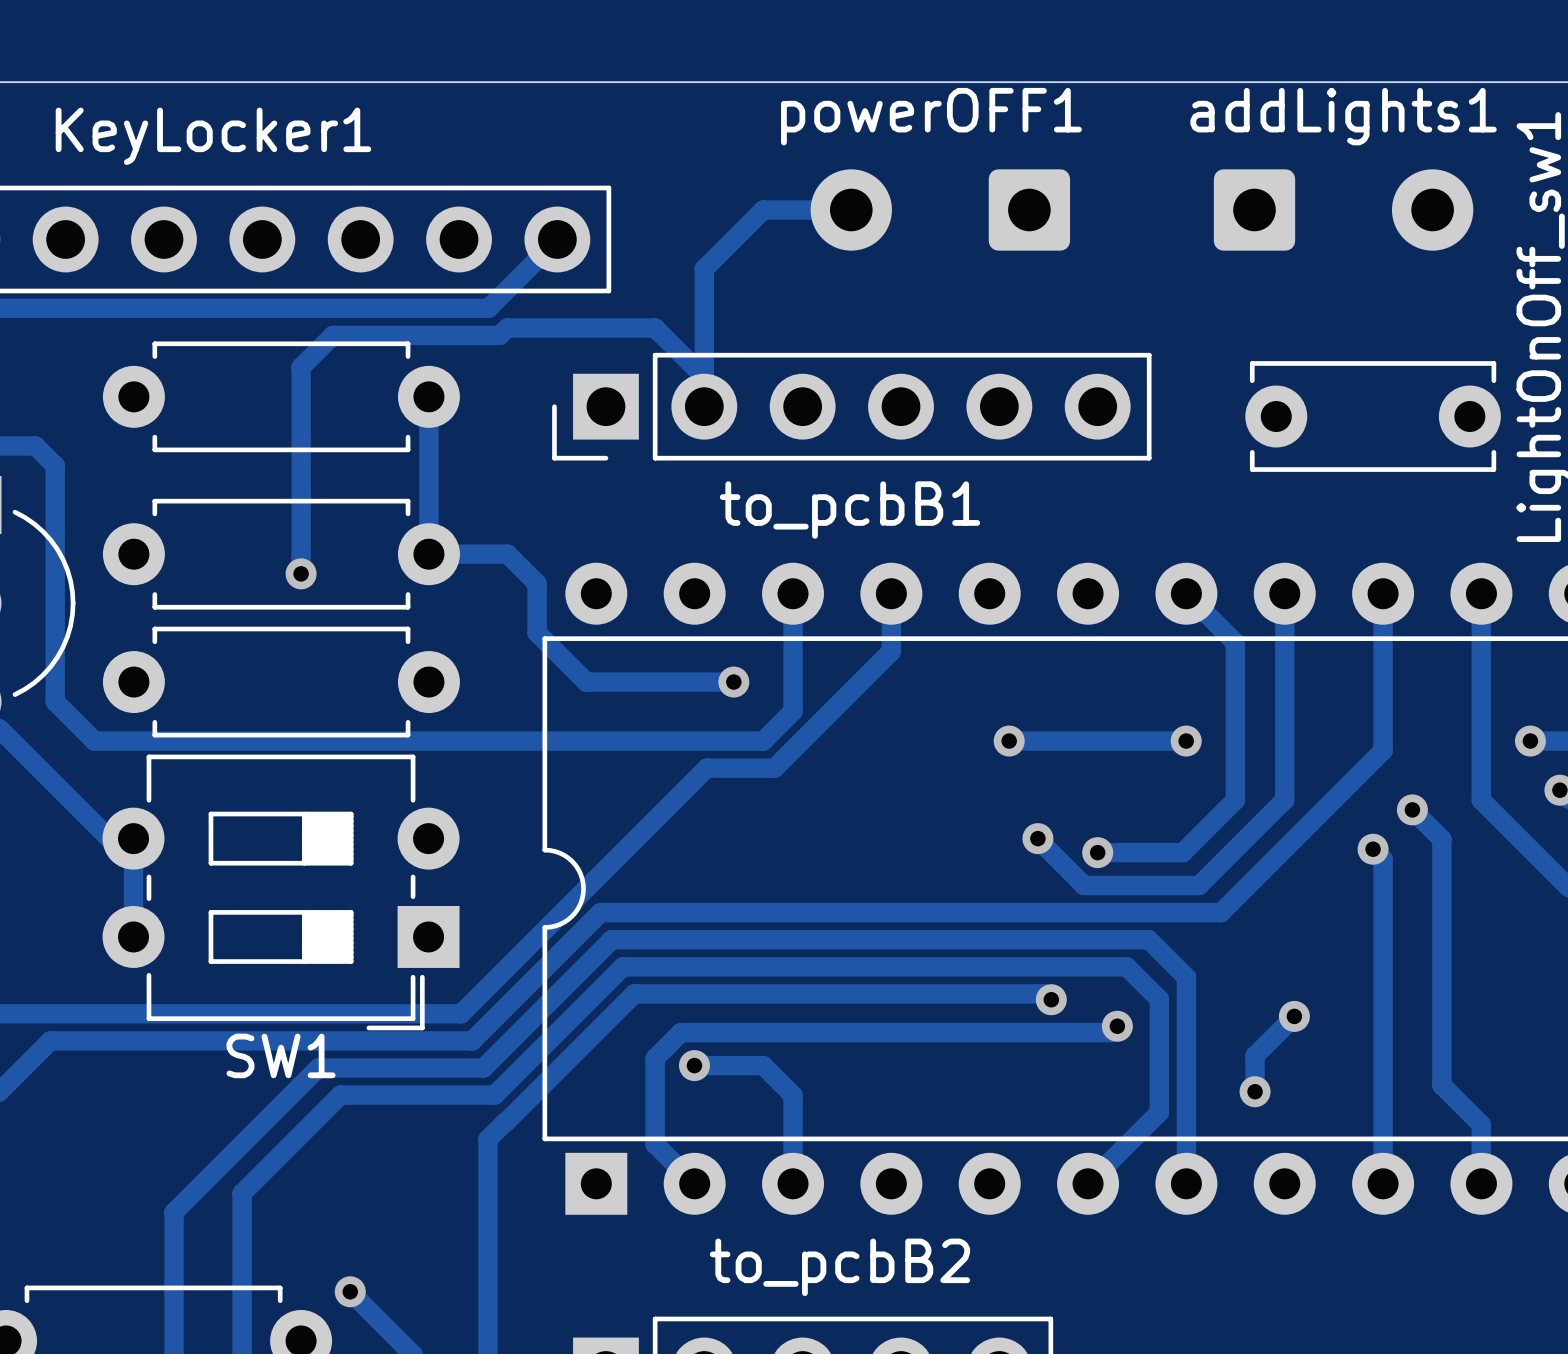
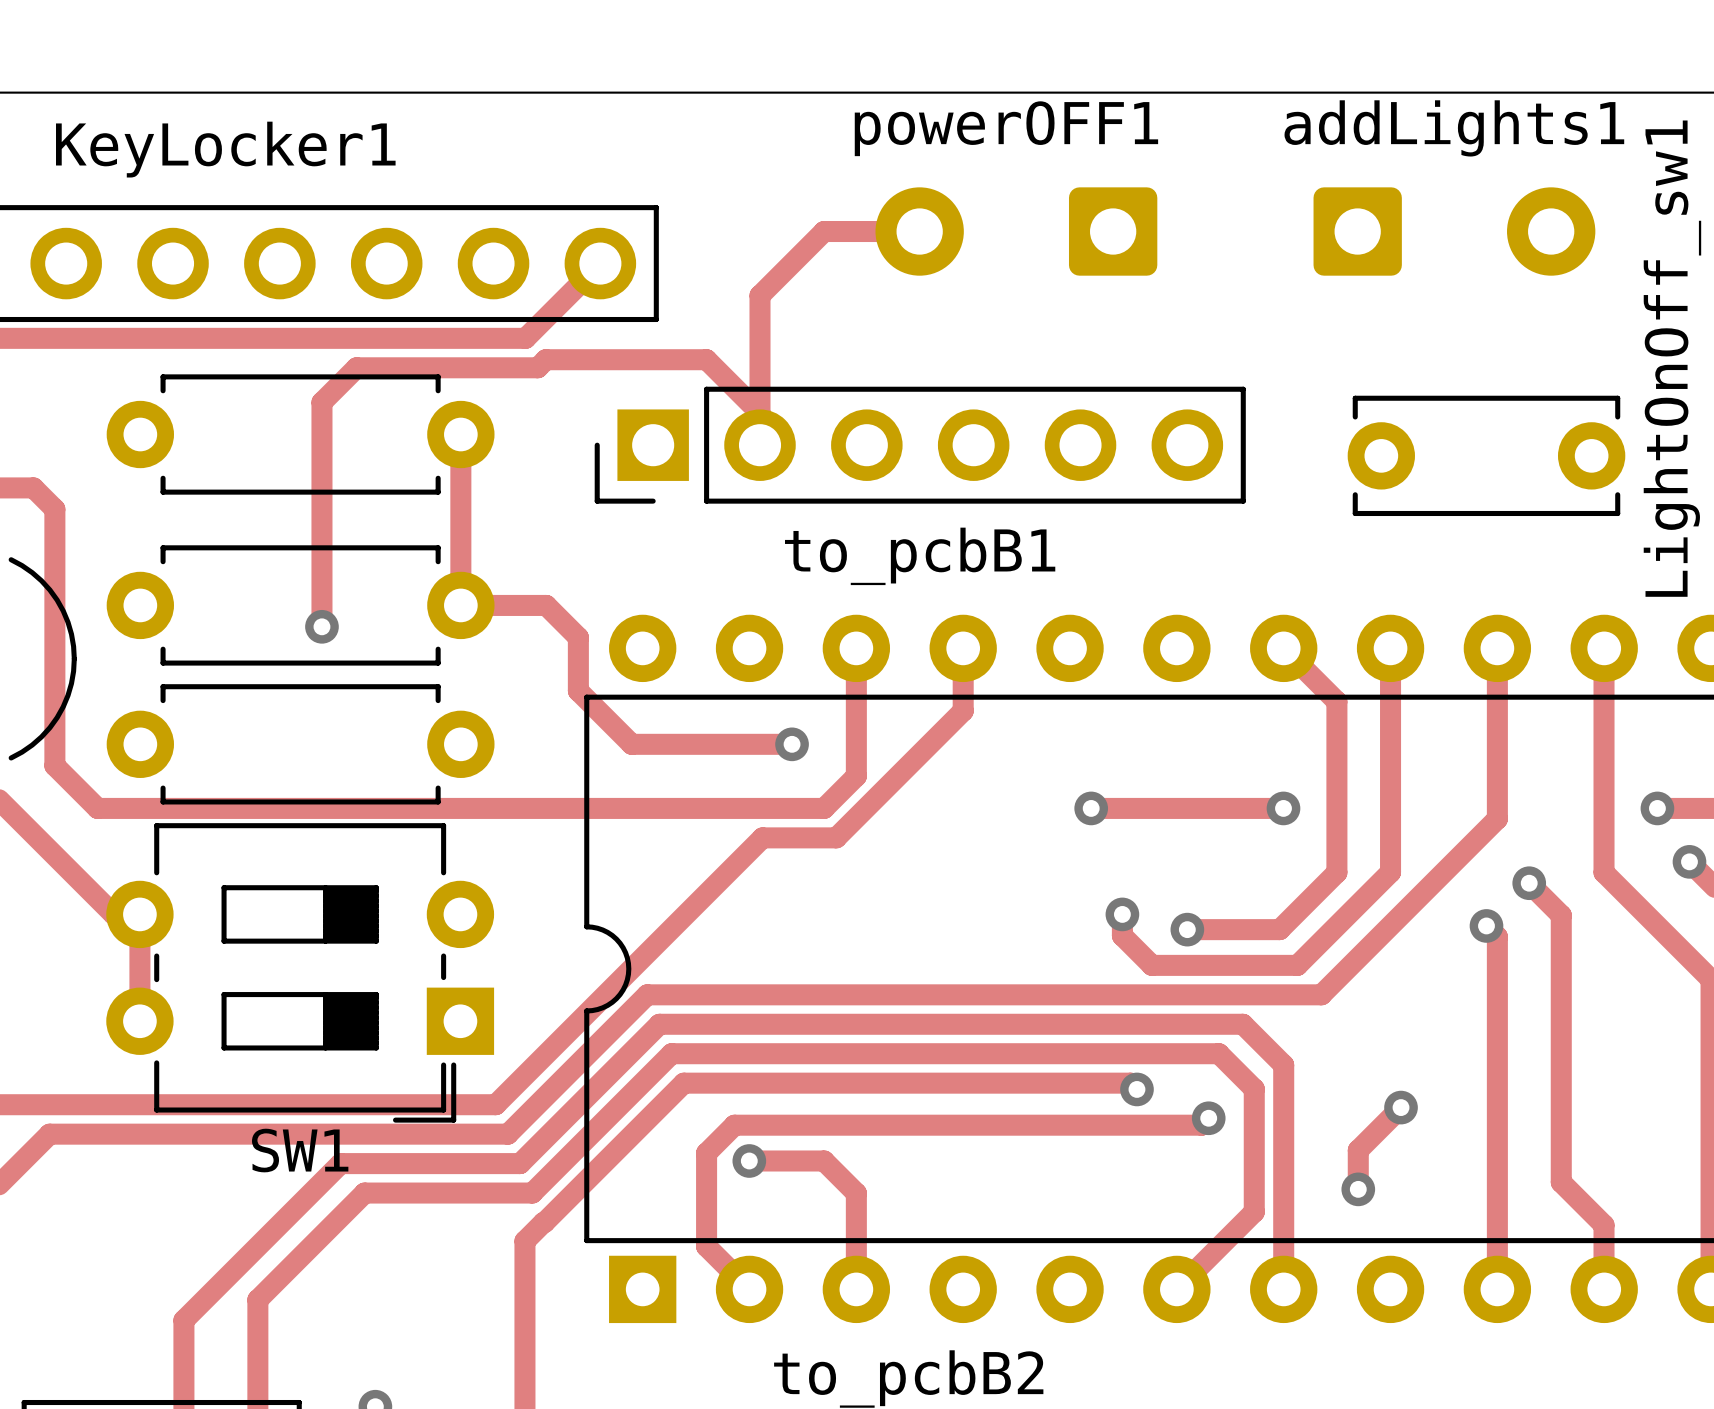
track: (1037, 839) (1084, 885) -> (1122, 915) (1122, 935) (1151, 965) (1172, 965)

